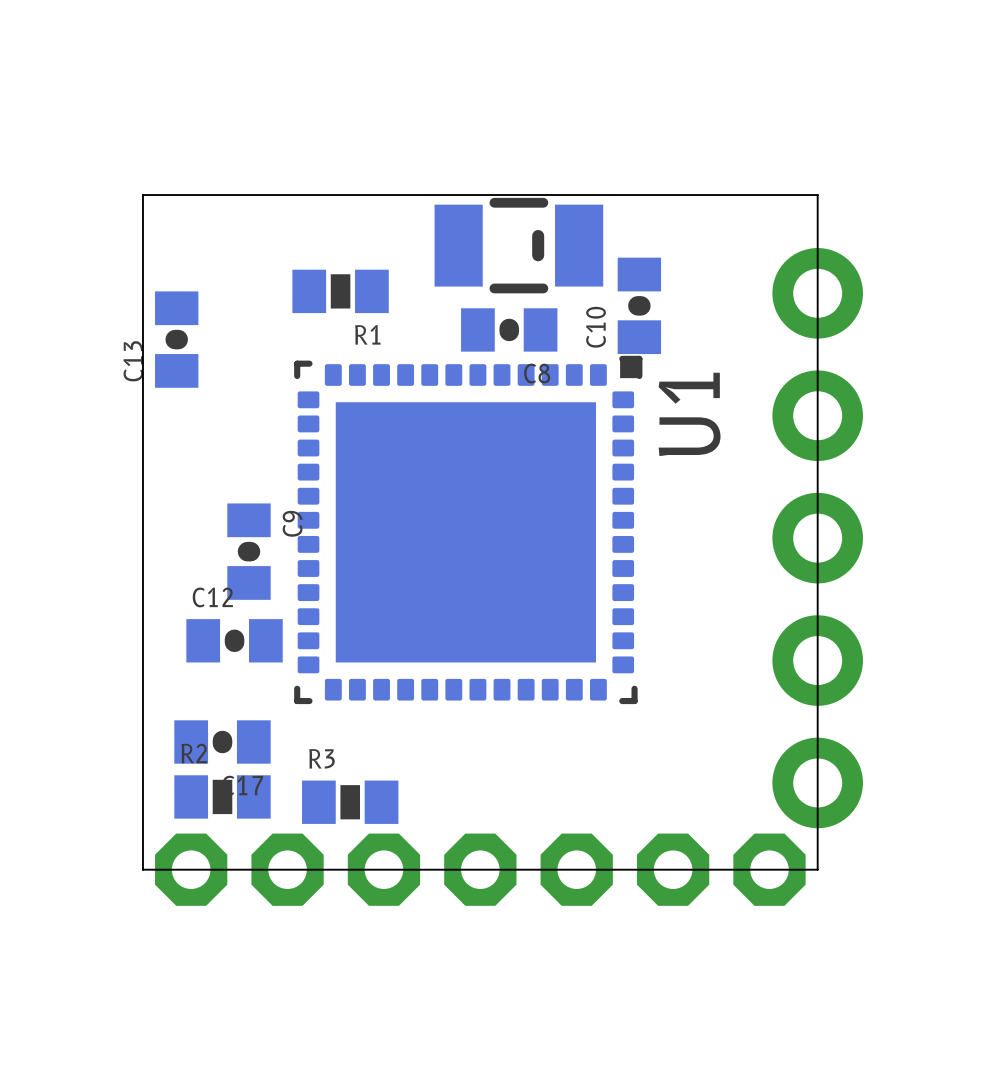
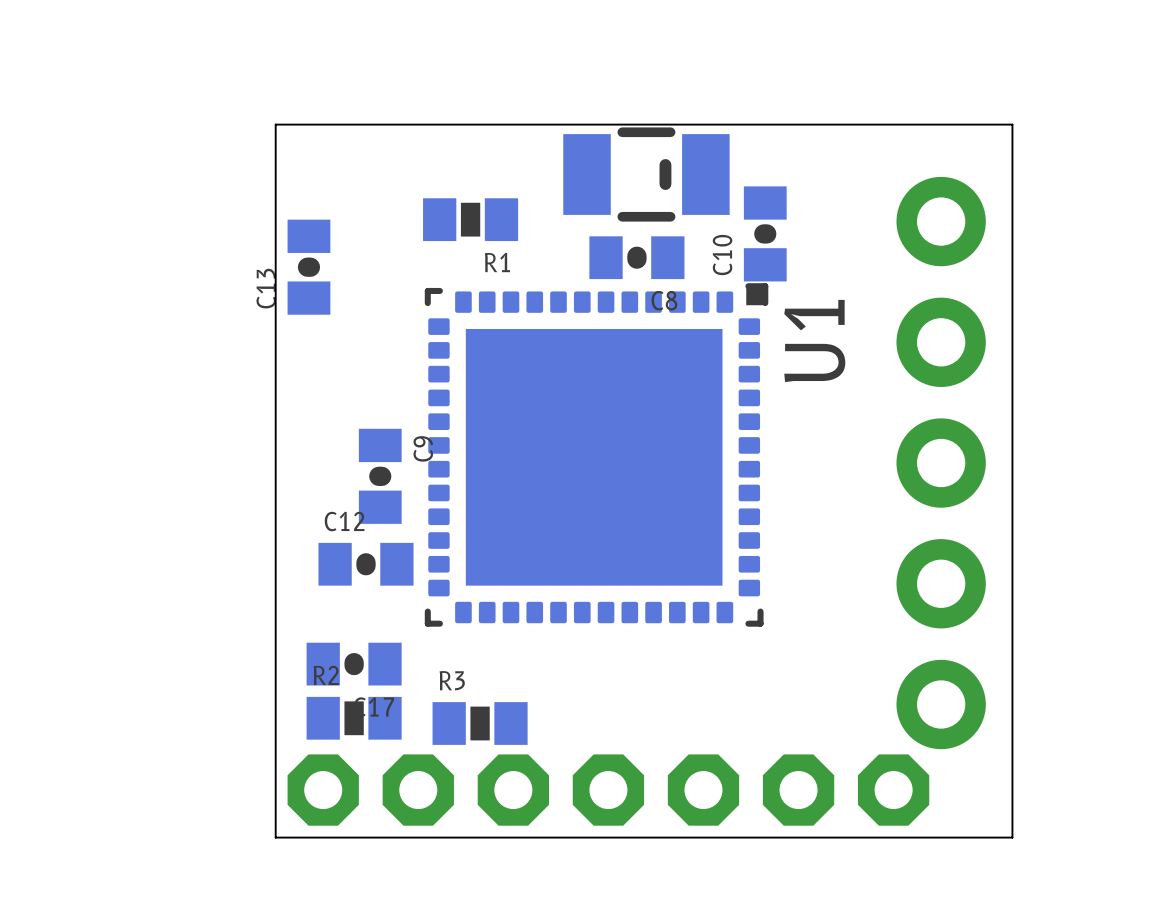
board edge: (817, 195) (817, 869) (142, 869) -> (941, 124) (1012, 124) (1012, 837) (275, 837) (275, 790)

